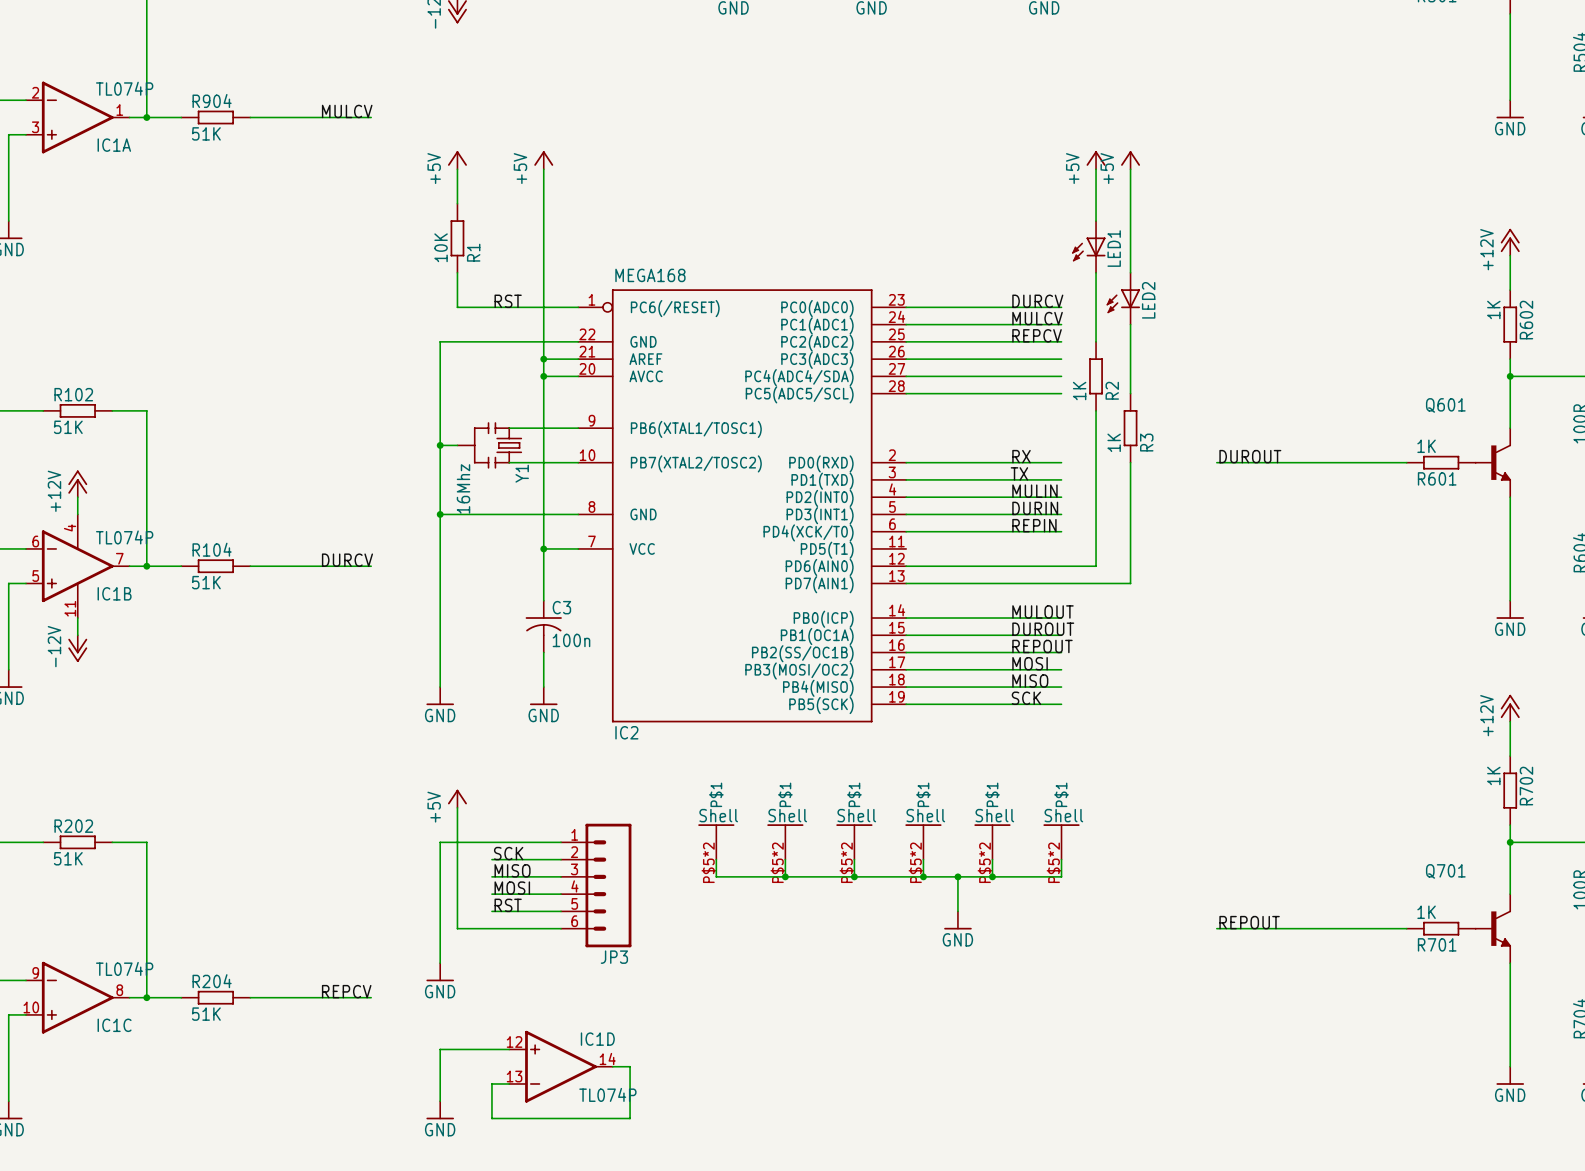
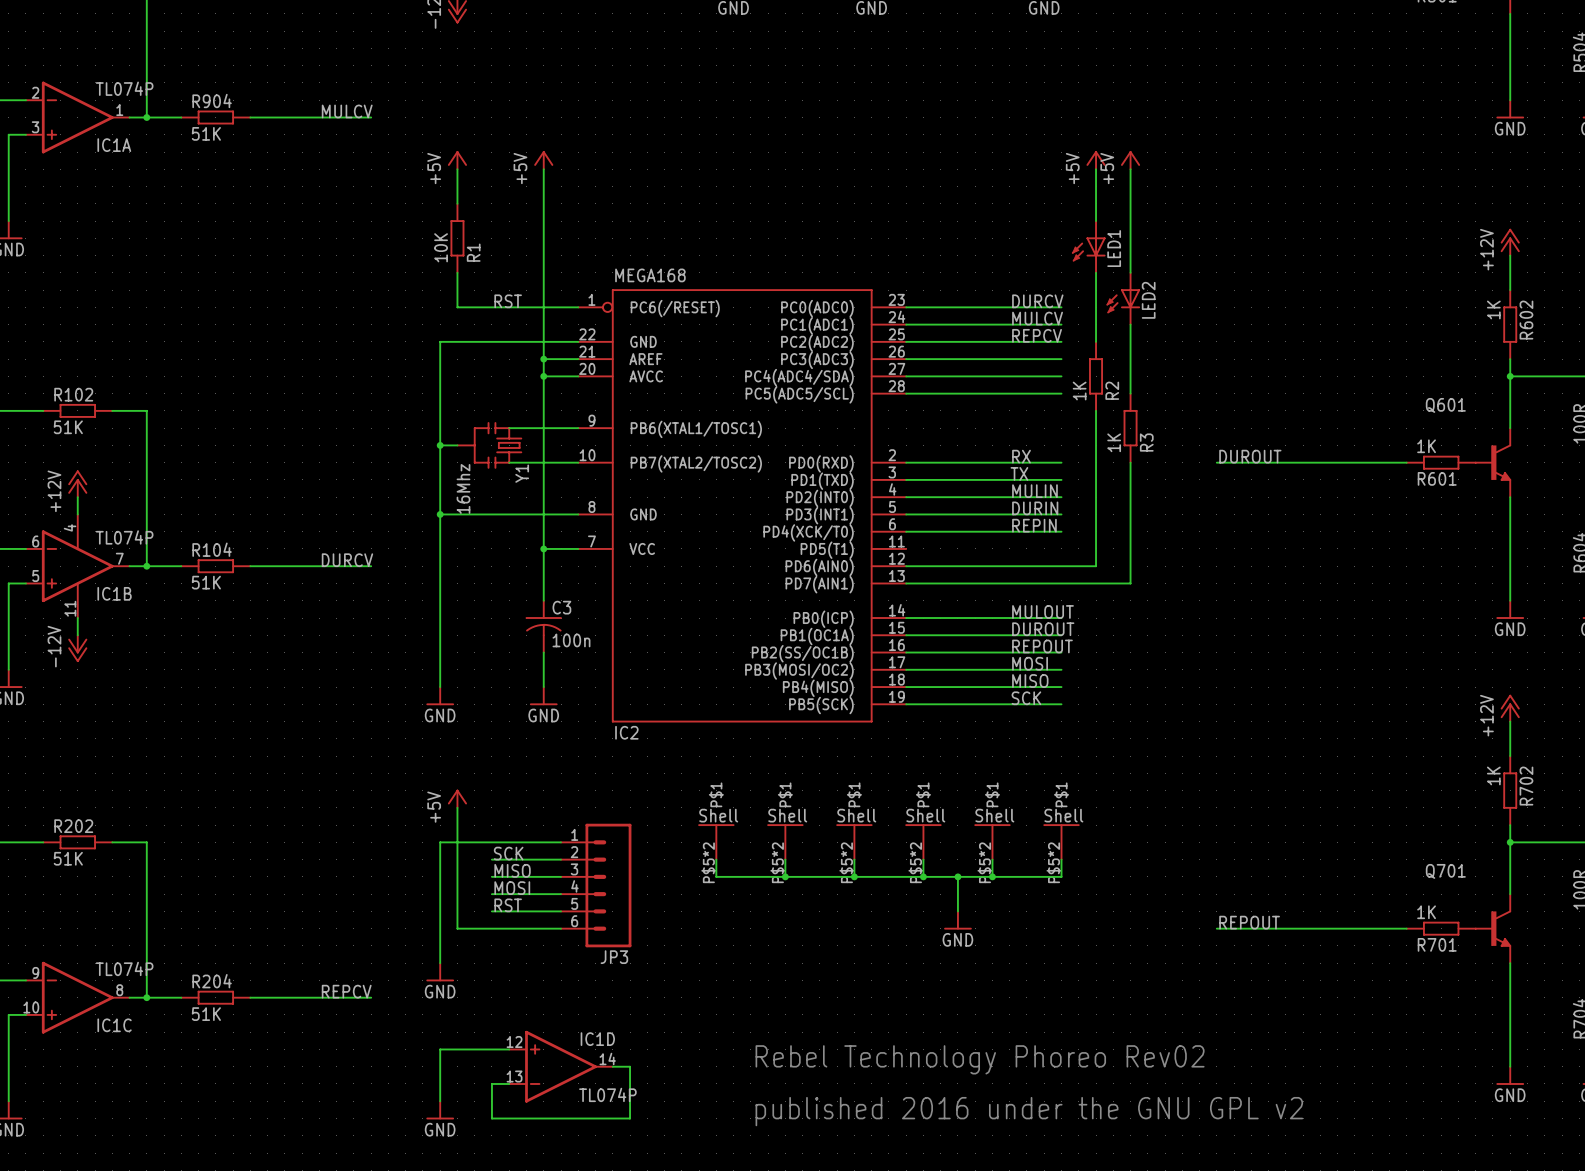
text: none -> Rebel Technology Phoreo Rev02 (980, 1059)
text: none -> published 2016 under the GNU GPL v2 (1029, 1111)

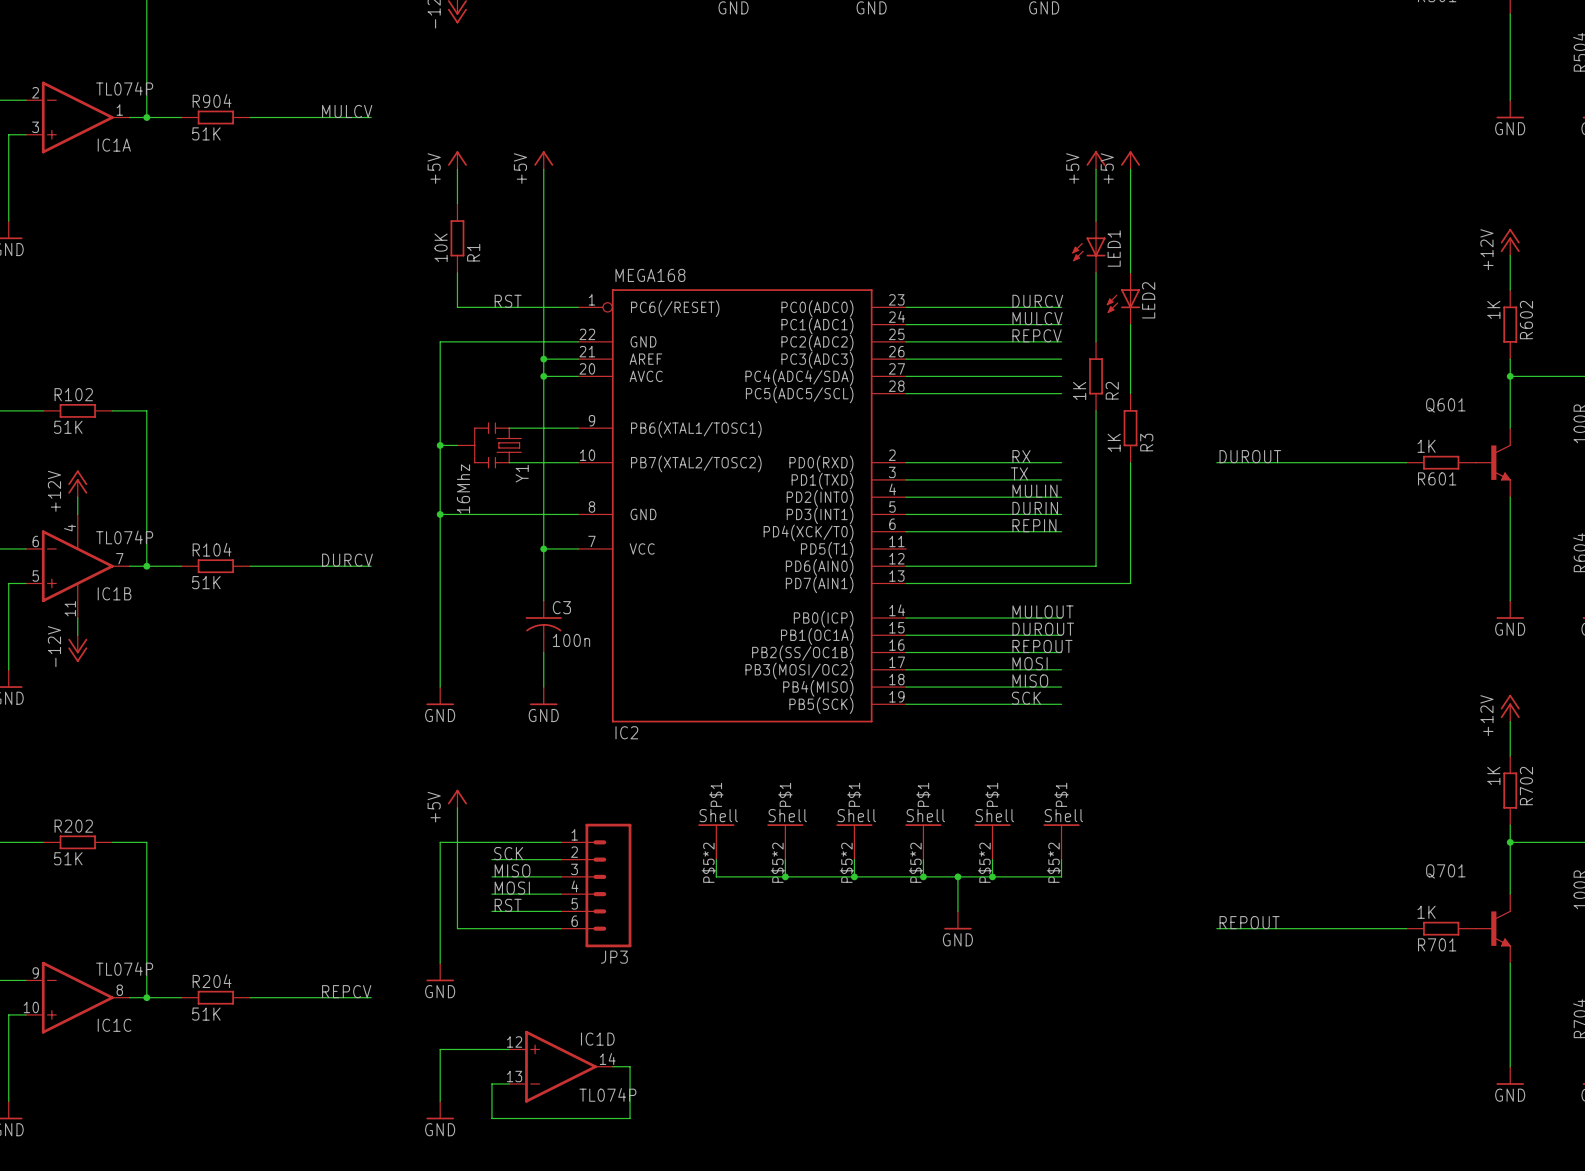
text: Rebel Technology Phoreo Rev02 (980, 1059) -> none
text: published 2016 under the GNU GPL v2 (1029, 1111) -> none

